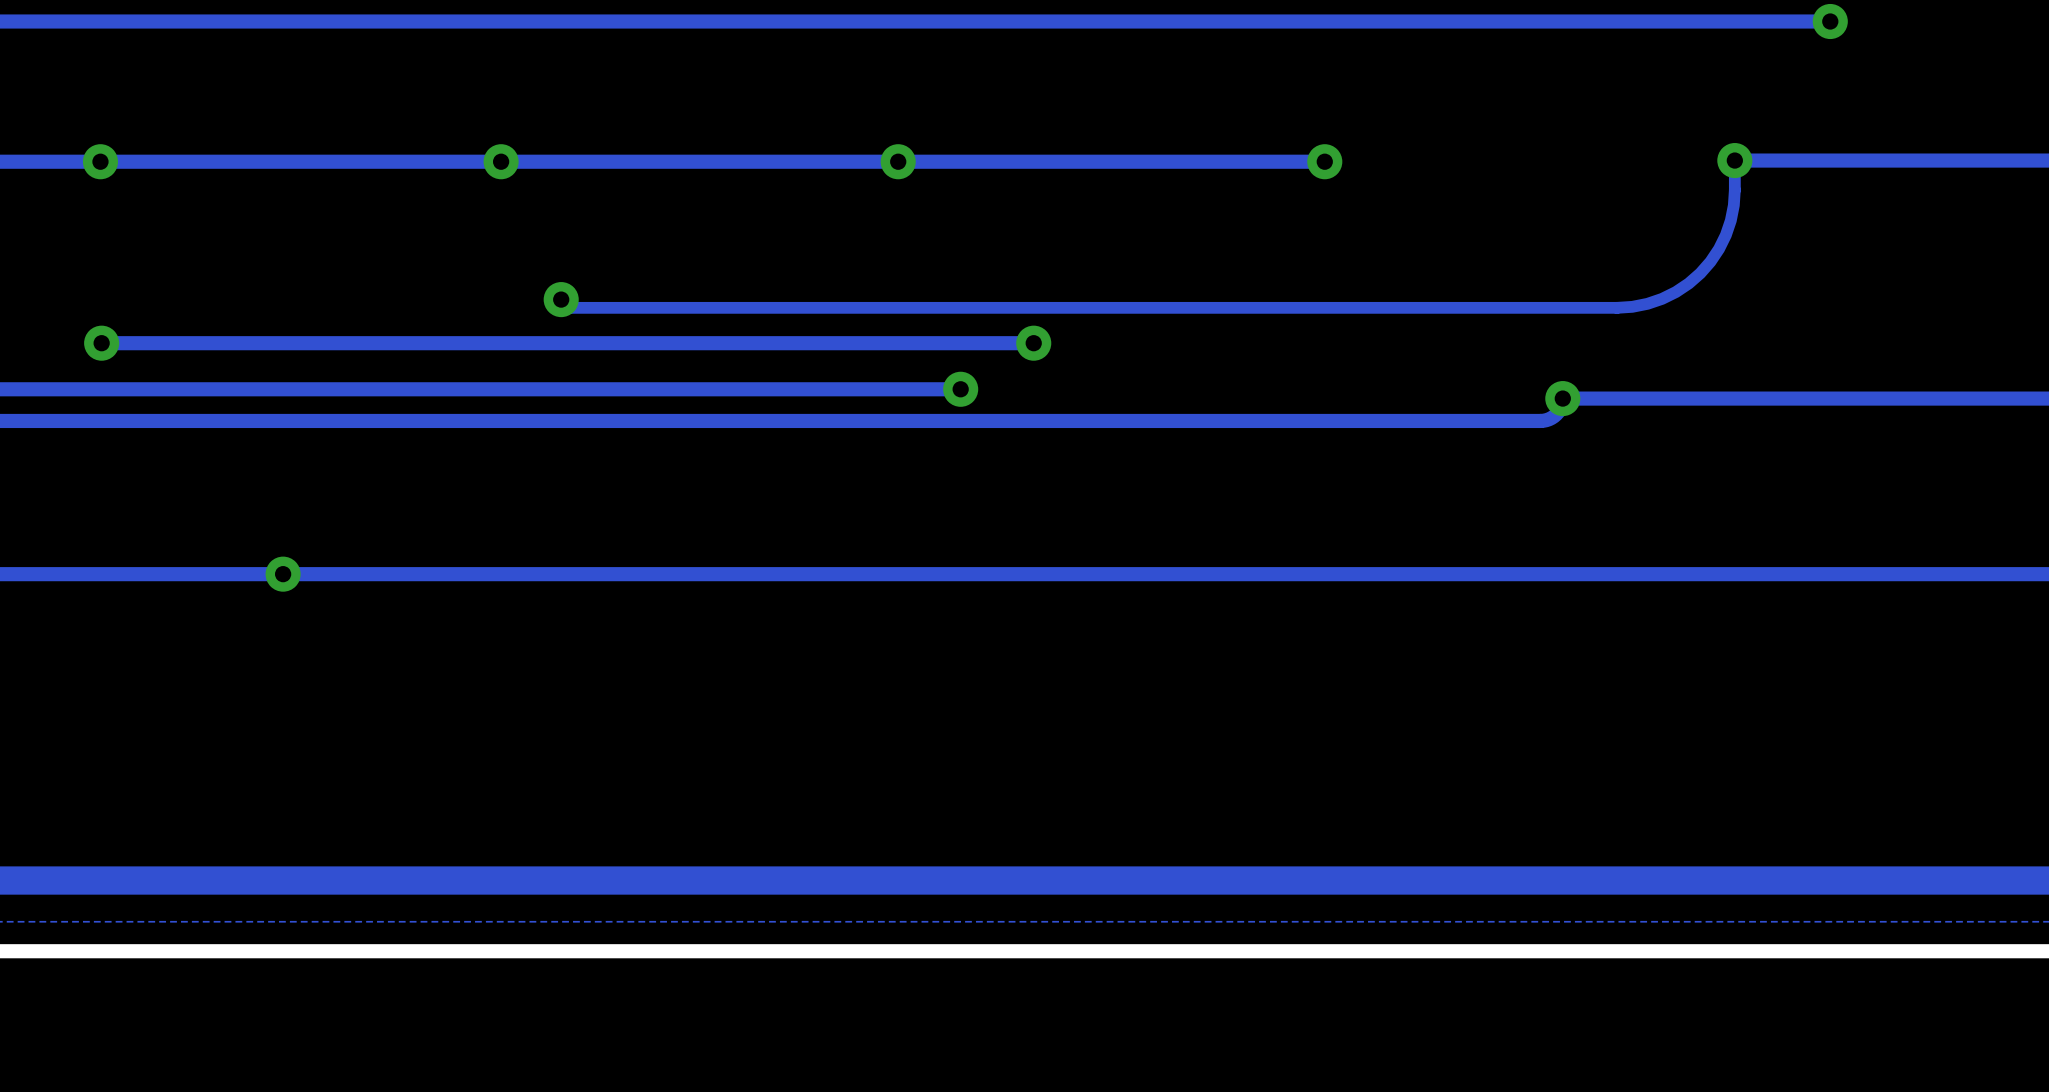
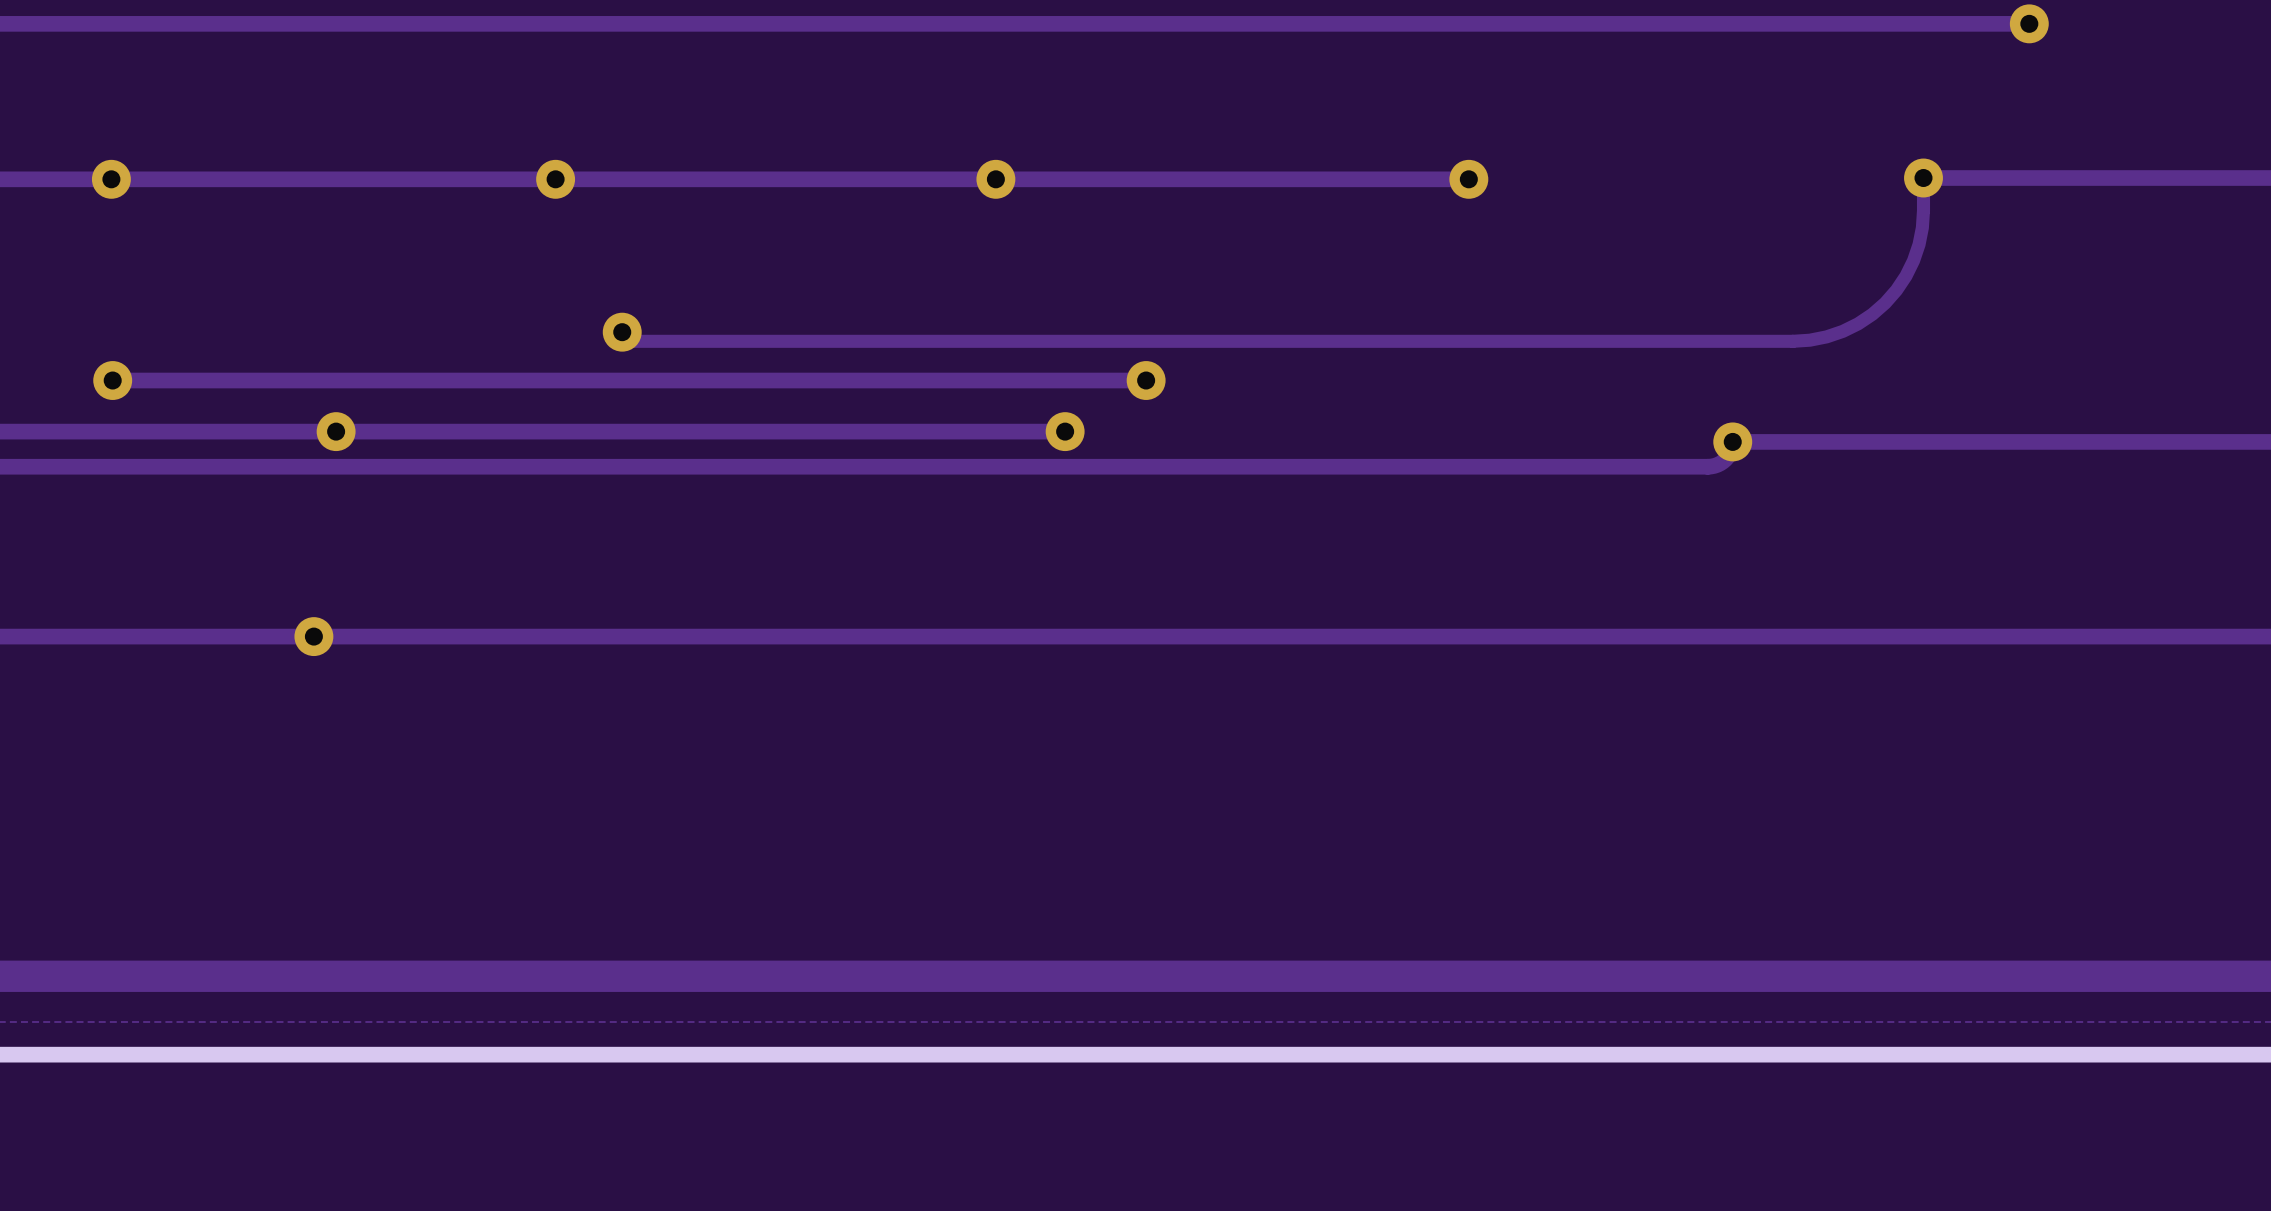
via: none -> (336, 431)

